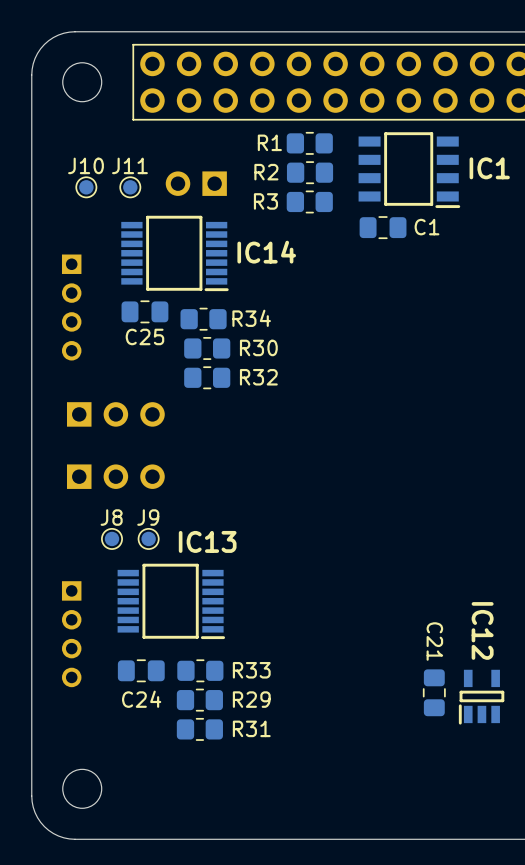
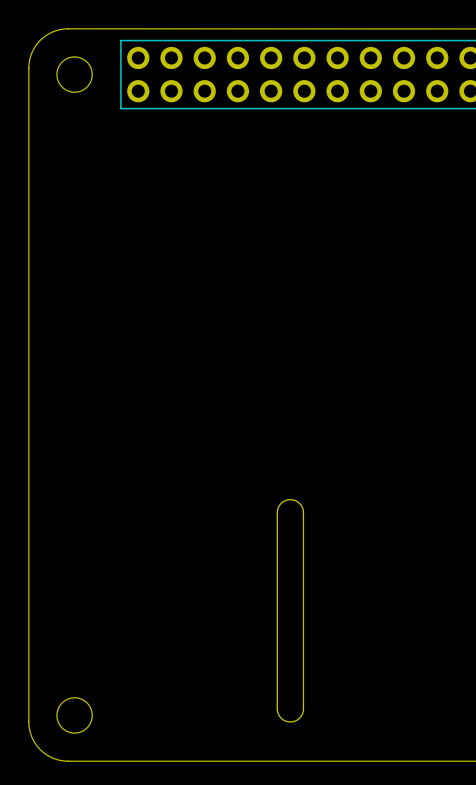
R1: (309, 143) -> none
IC1: (409, 170) -> none
R2: (310, 172) -> none
part: (196, 183) -> none
J10: (86, 187) -> none
J11: (130, 187) -> none
R3: (309, 201) -> none
C1: (383, 227) -> none
IC14: (174, 253) -> none
part: (71, 307) -> none
C25: (144, 311) -> none
R34: (203, 319) -> none
R30: (207, 348) -> none
R32: (207, 377) -> none
part: (115, 414) -> none
part: (115, 476) -> none
J8: (112, 538) -> none
J9: (148, 538) -> none
board edge: none -> (303, 512) (303, 710) (298, 719) (288, 721) (280, 716) (277, 708) (277, 511) (282, 502) (292, 499) (300, 504) (303, 512)
IC13: (171, 601) -> none
part: (71, 634) -> none
C24: (141, 670) -> none
R33: (200, 670) -> none
C21: (434, 692) -> none
IC12: (481, 697) -> none
R29: (199, 700) -> none
R31: (199, 729) -> none

